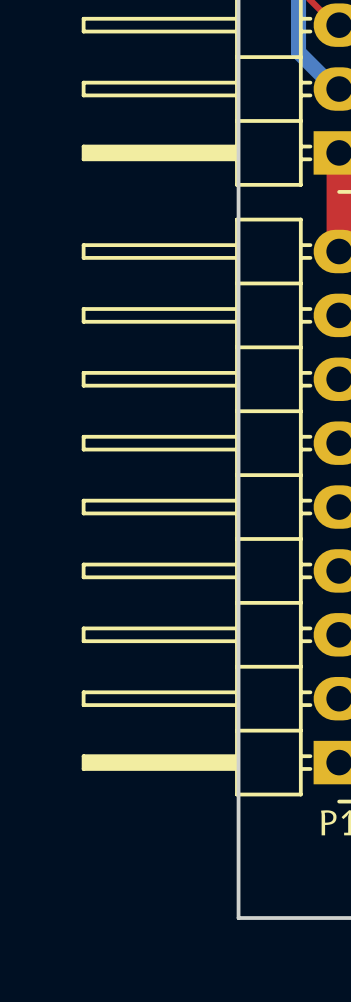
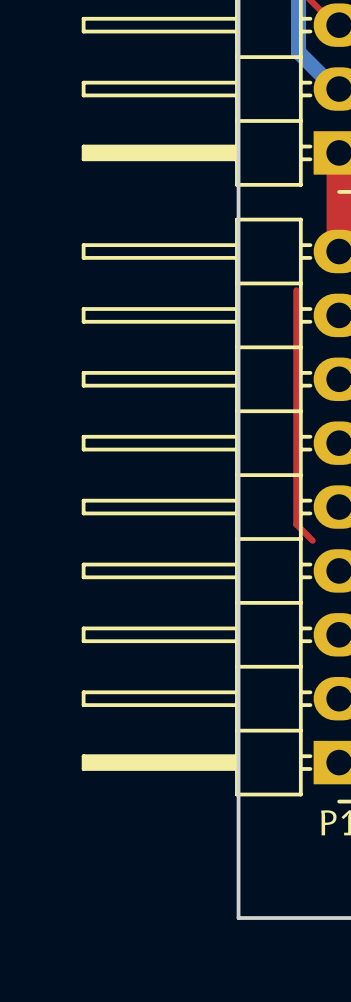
top track: none -> (296, 290) (296, 524) (312, 540)

